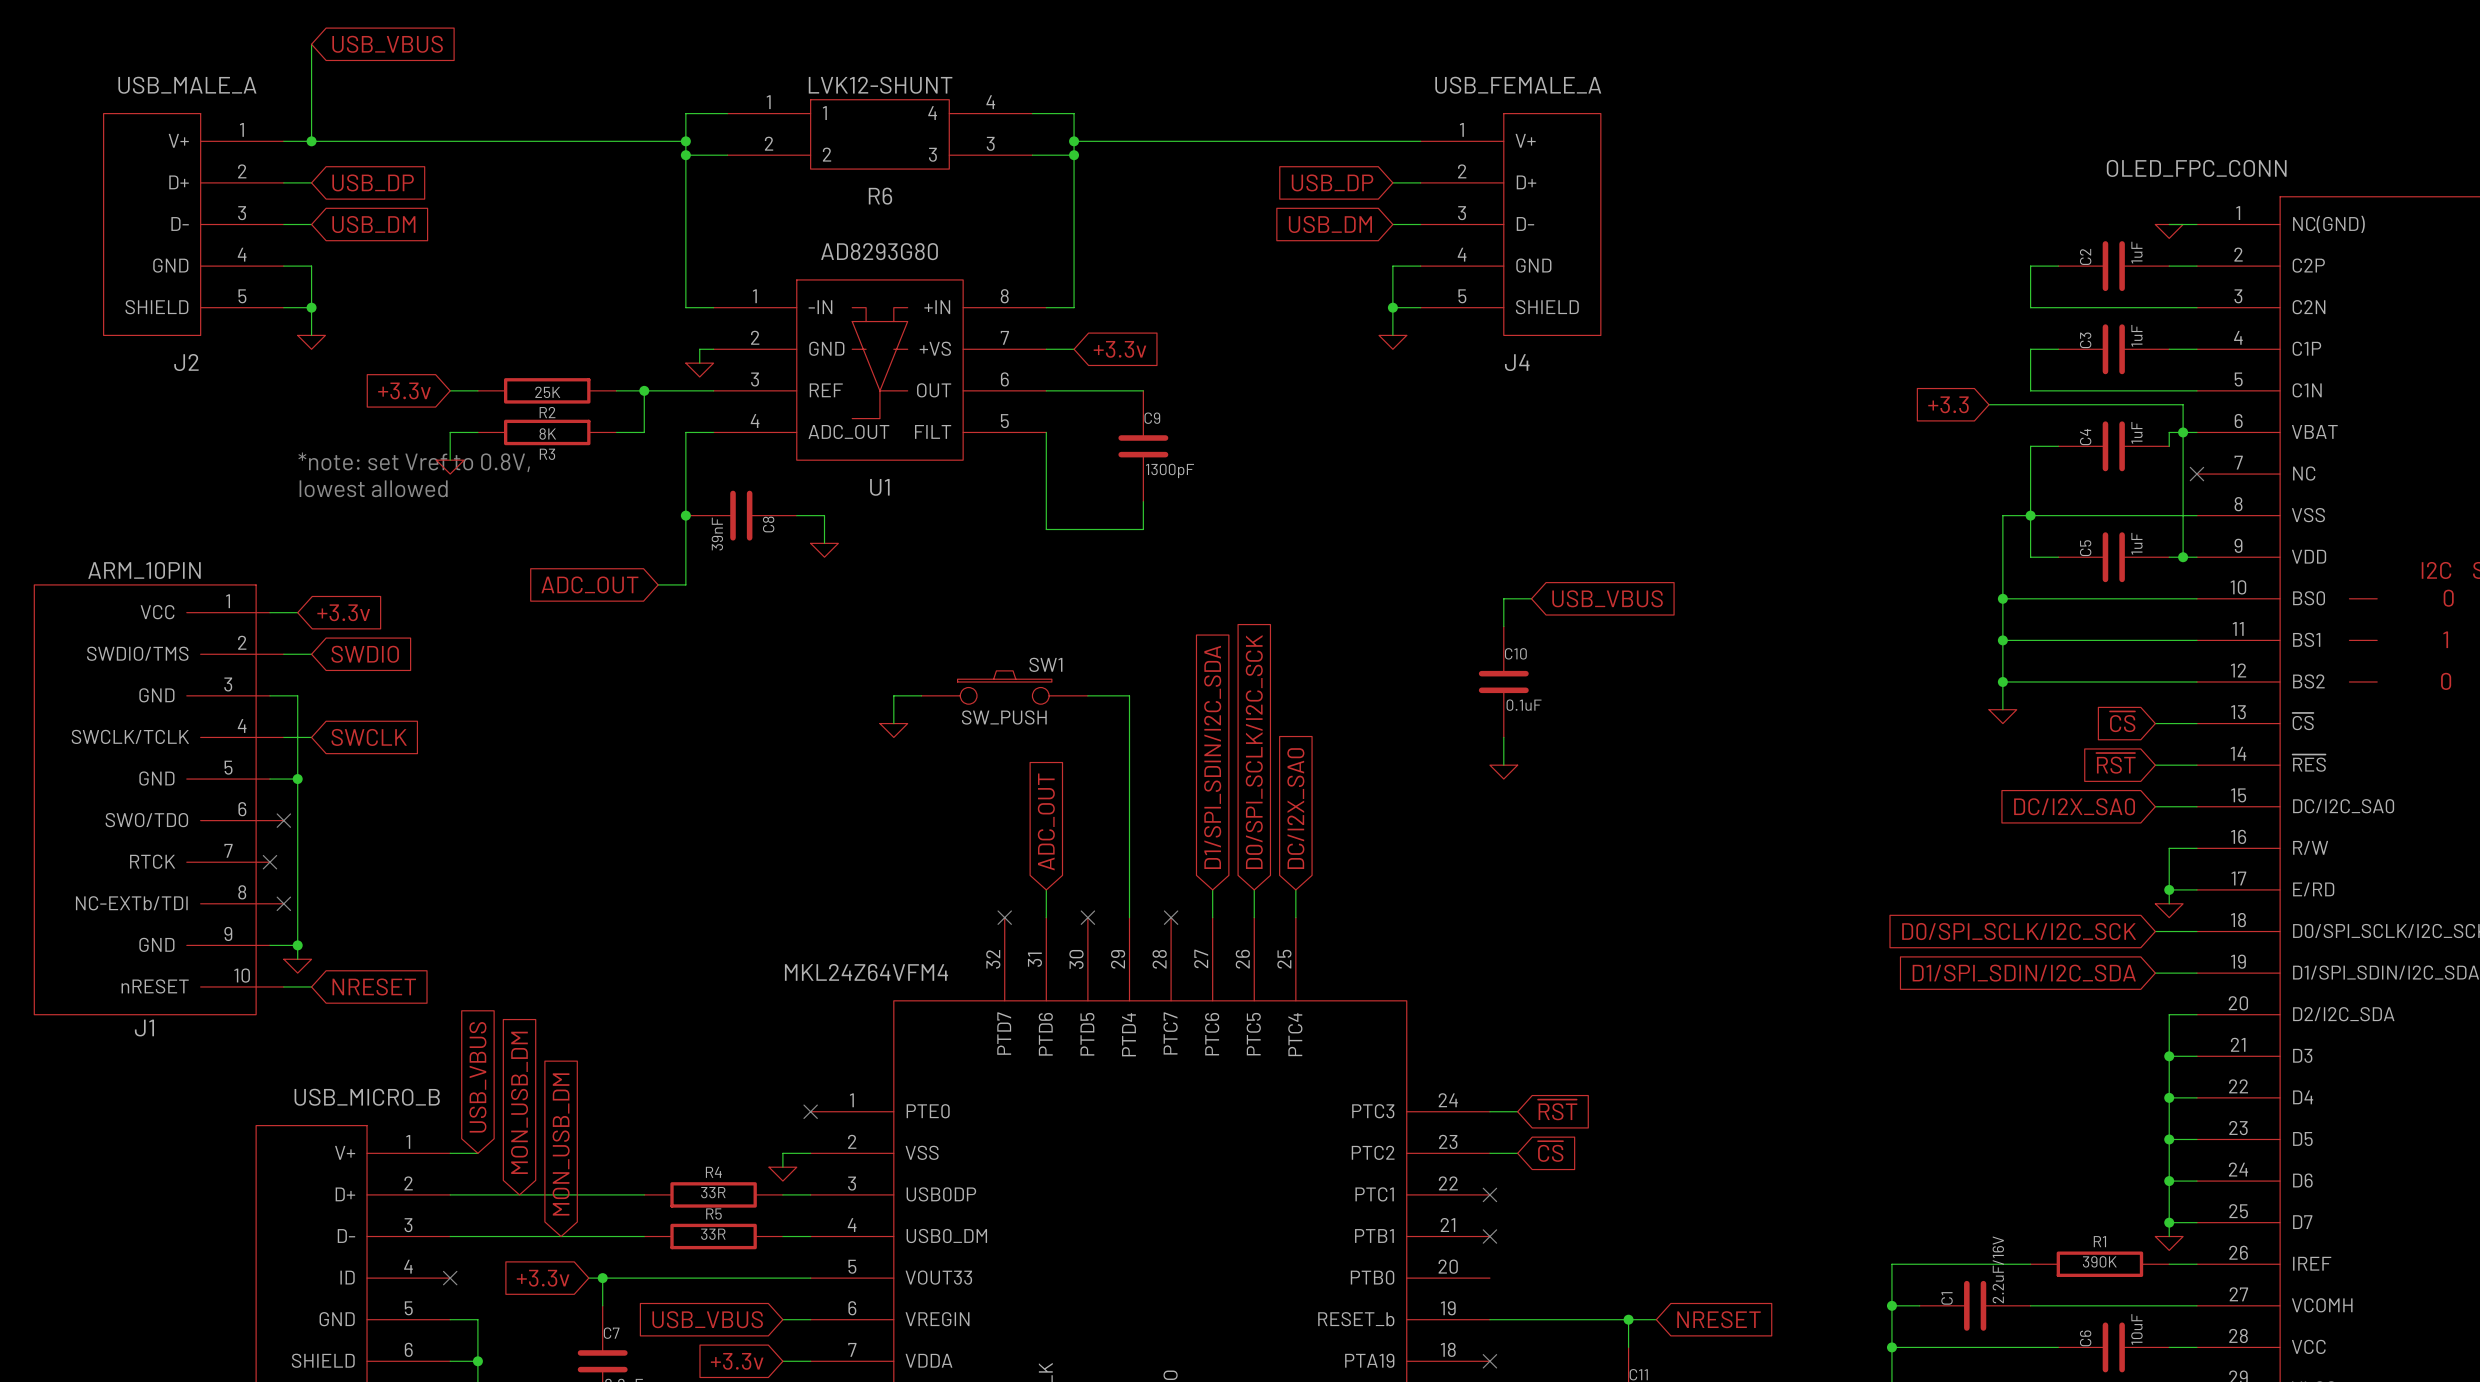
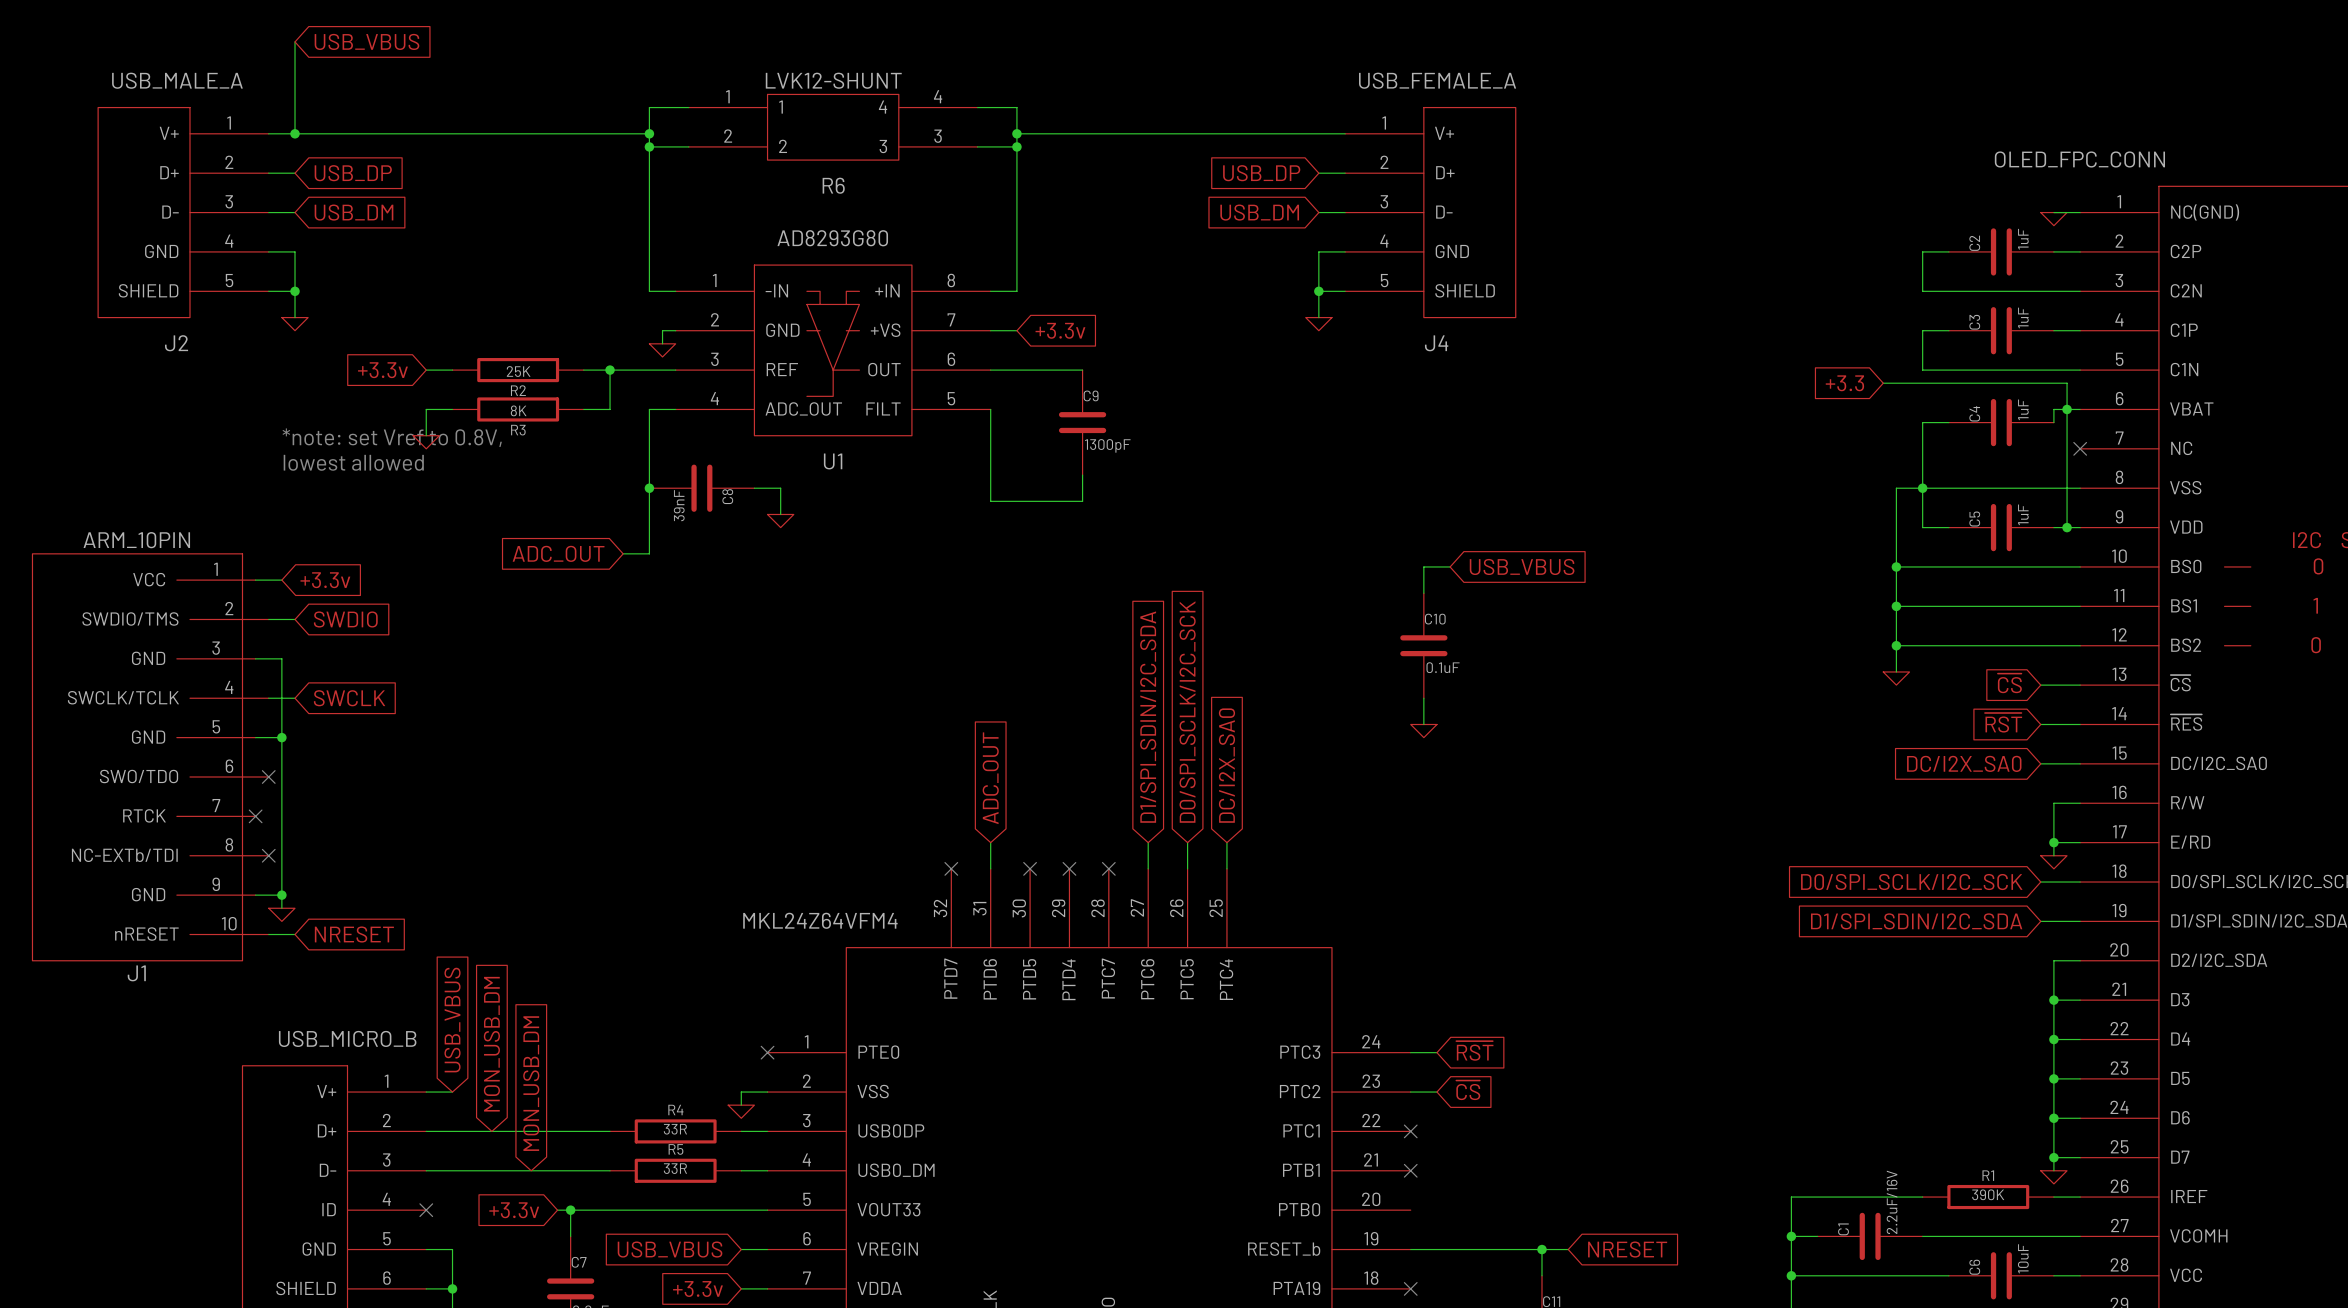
SW1: SW_PUSH (1004, 687) -> none
wire: (921, 695) (893, 695) (893, 723) -> none
wire: (1087, 695) (1129, 695) (1129, 917) -> none
power symbol: (893, 730) -> none
no-connect mark: none -> (1069, 868)

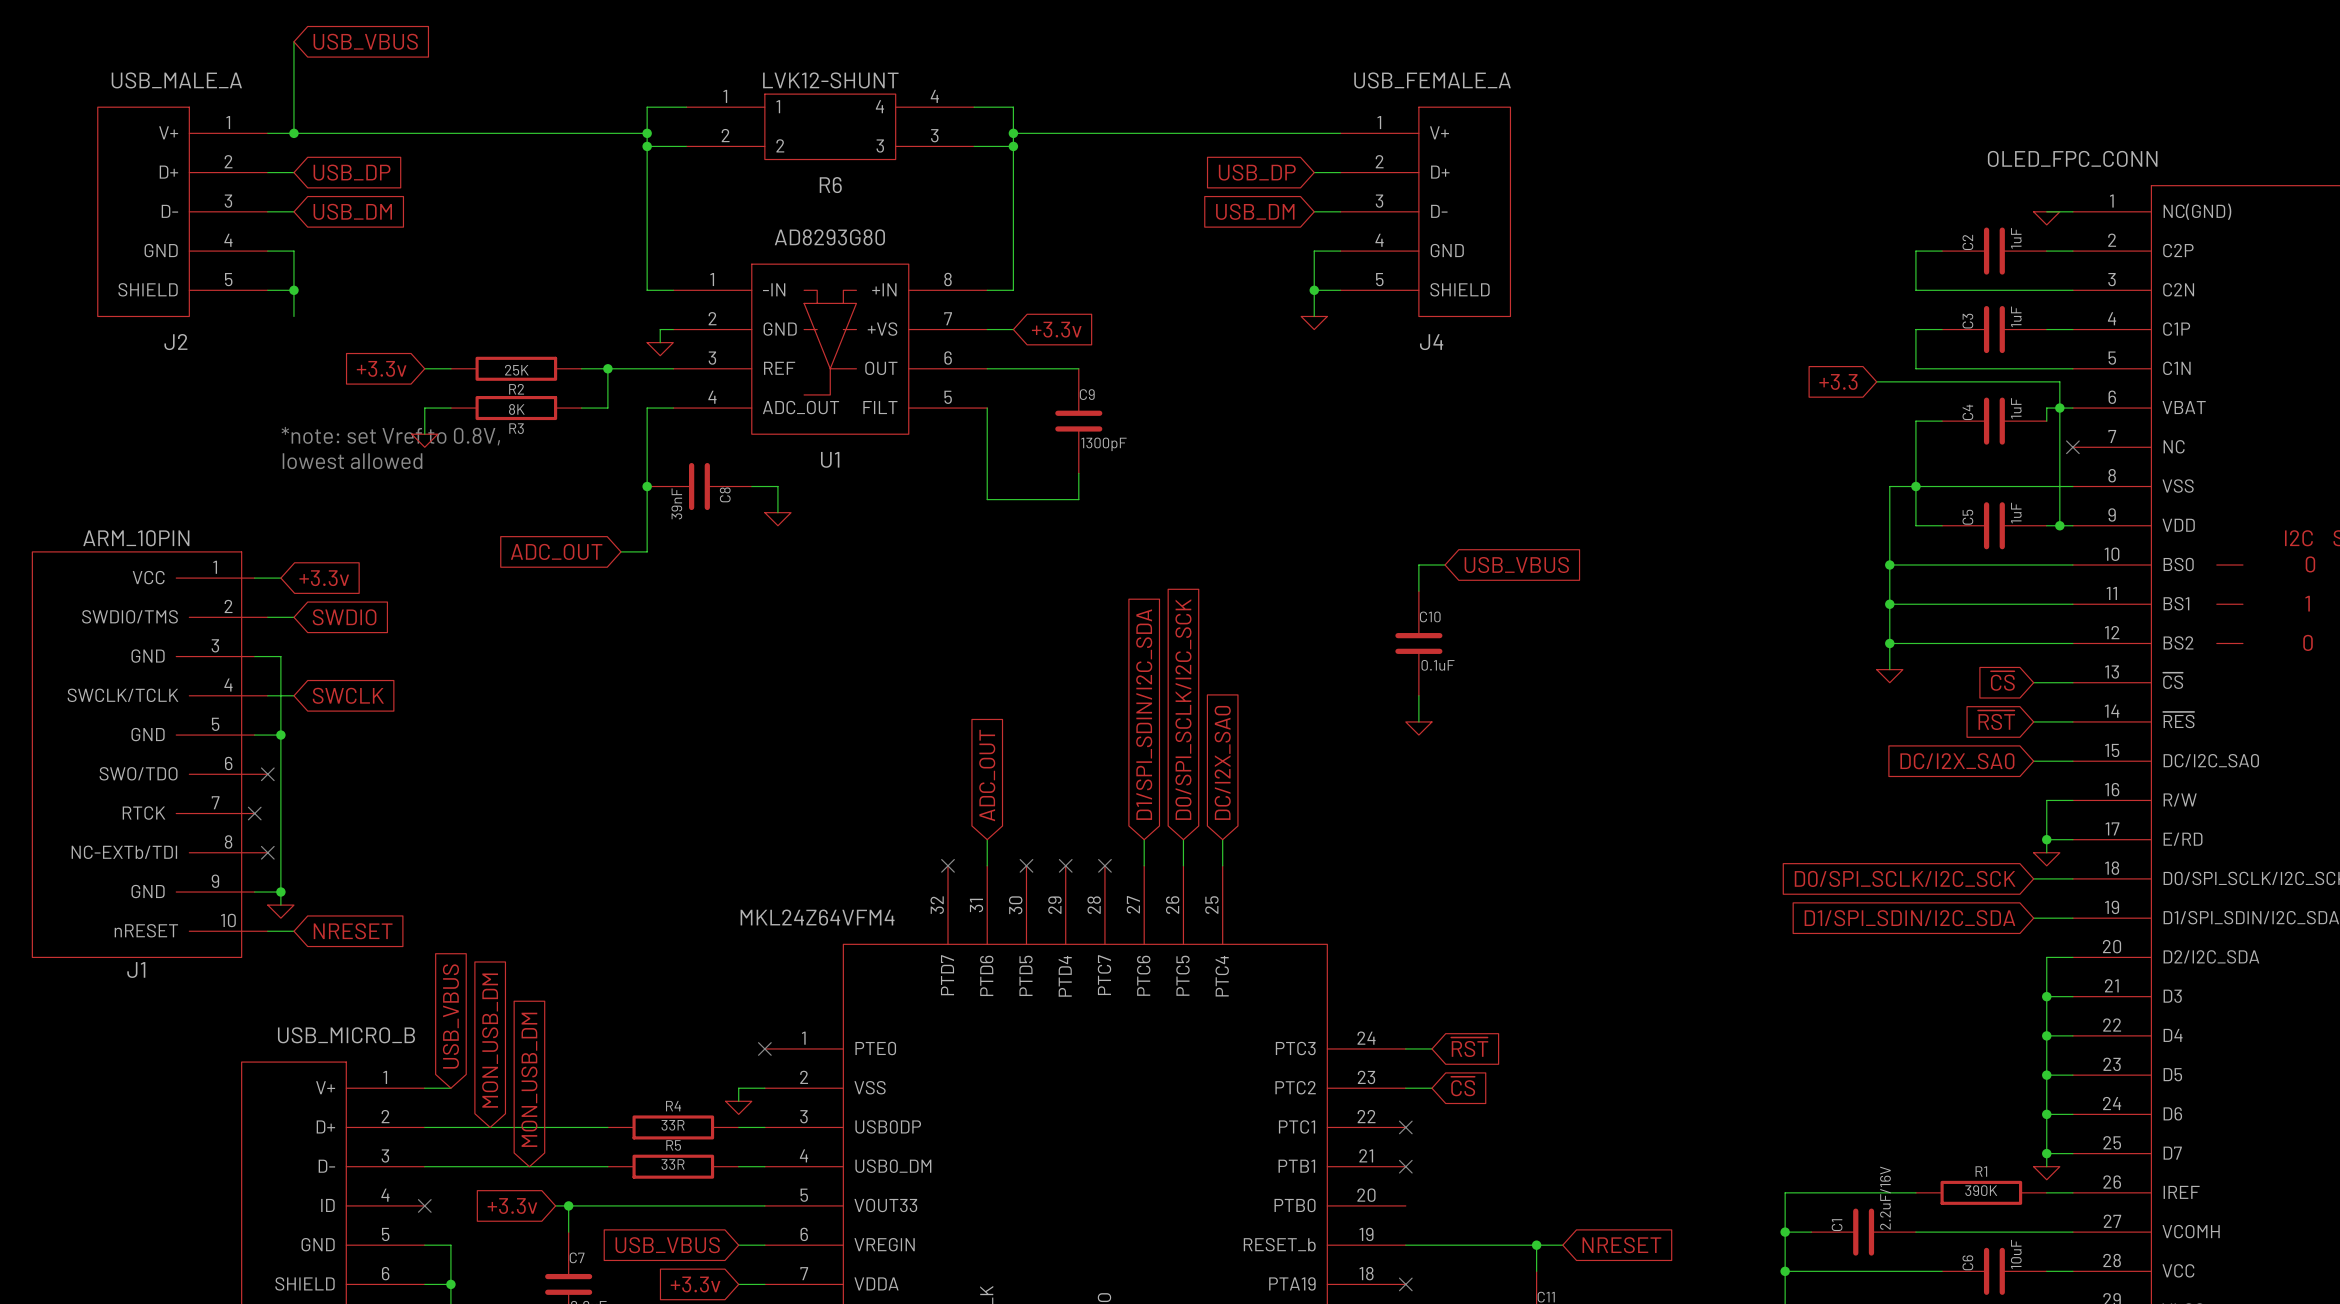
power symbol: (295, 324) -> none

